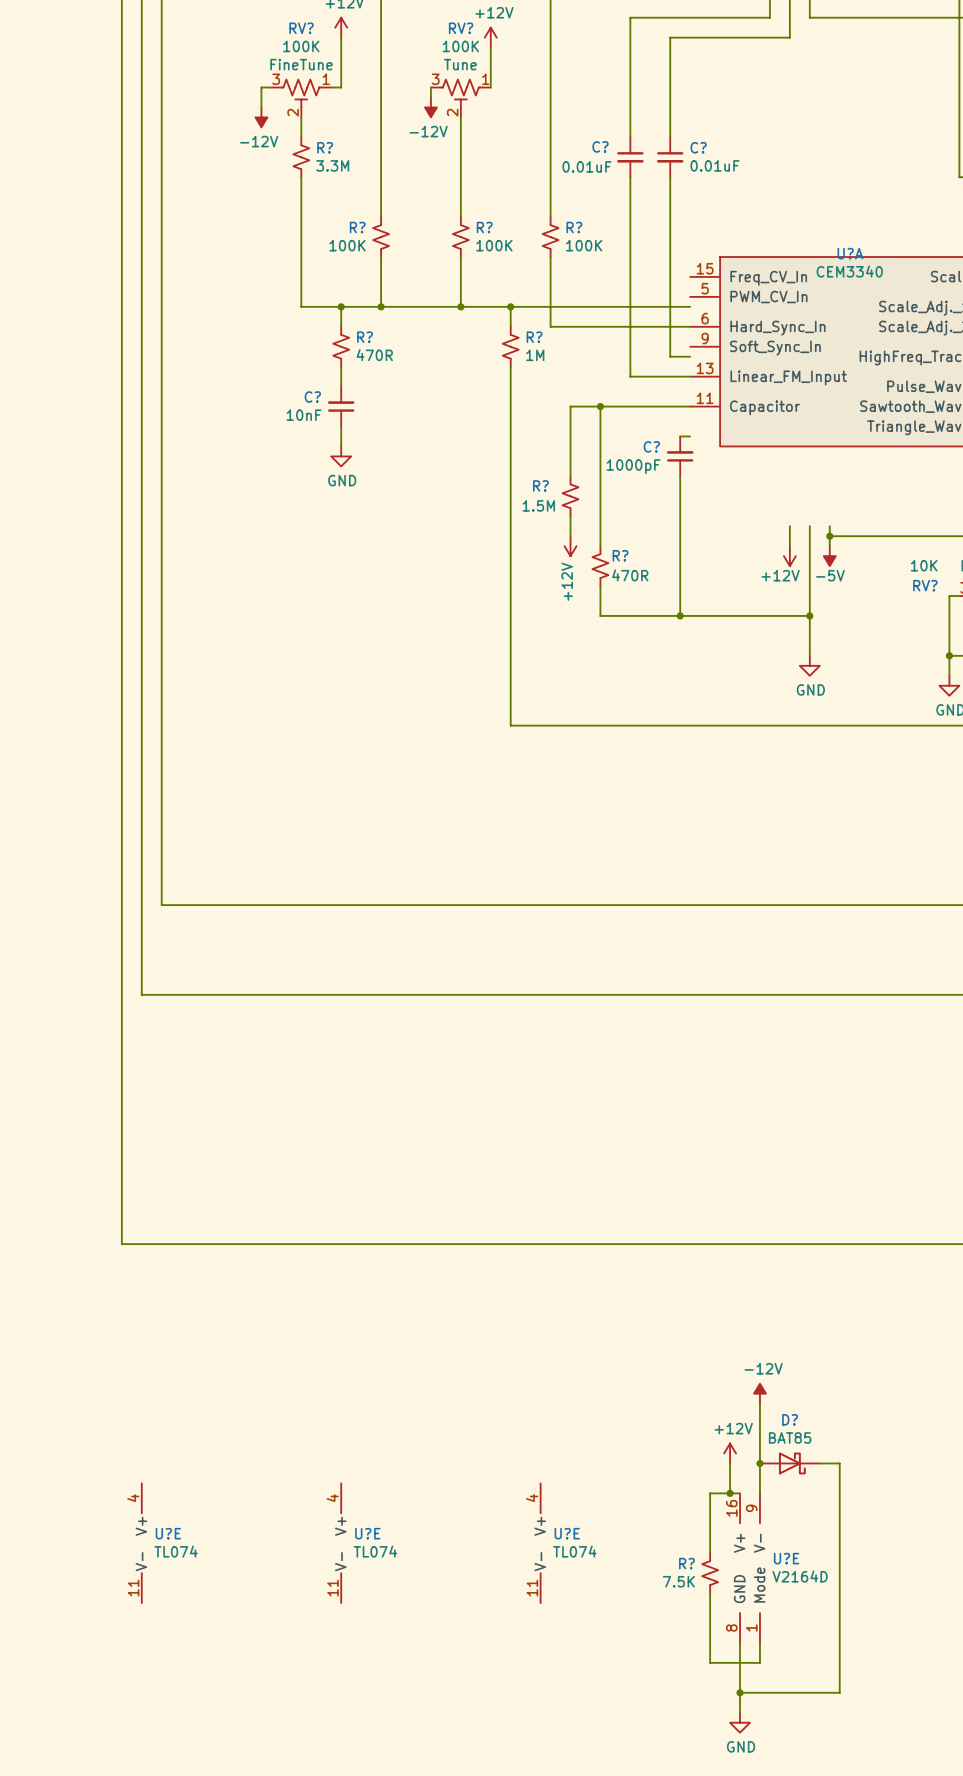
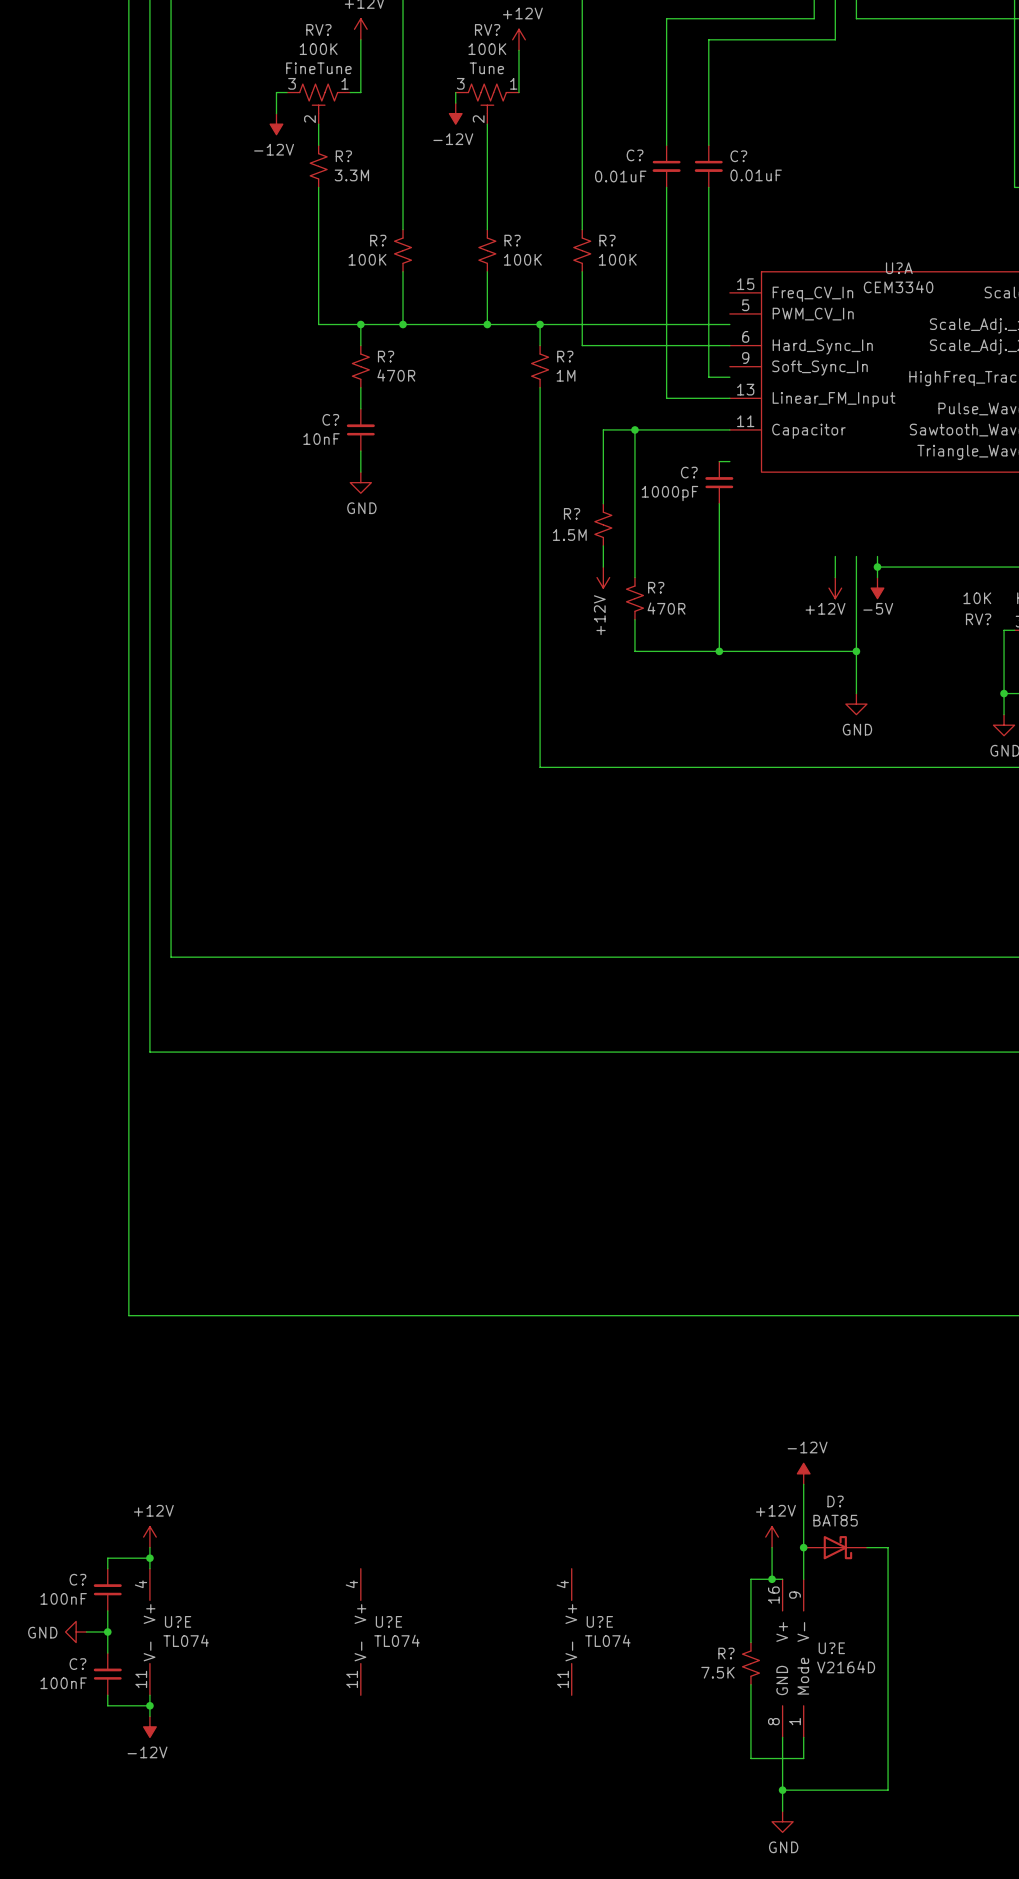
power symbol: none -> +12V (149, 1537)
wire: none -> (149, 1547) (149, 1568)
wire: none -> (149, 1558) (107, 1558) (107, 1568)
junction: none -> (149, 1558)
C?: none -> 100nF (107, 1589)
wire: none -> (107, 1610) (107, 1653)
power symbol: none -> GND (76, 1631)
wire: none -> (86, 1631) (107, 1631)
junction: none -> (107, 1631)
C?: none -> 100nF (107, 1674)
wire: none -> (107, 1695) (107, 1705) (149, 1705)
wire: none -> (149, 1695) (149, 1716)
junction: none -> (149, 1705)
power symbol: none -> -12V (149, 1726)

